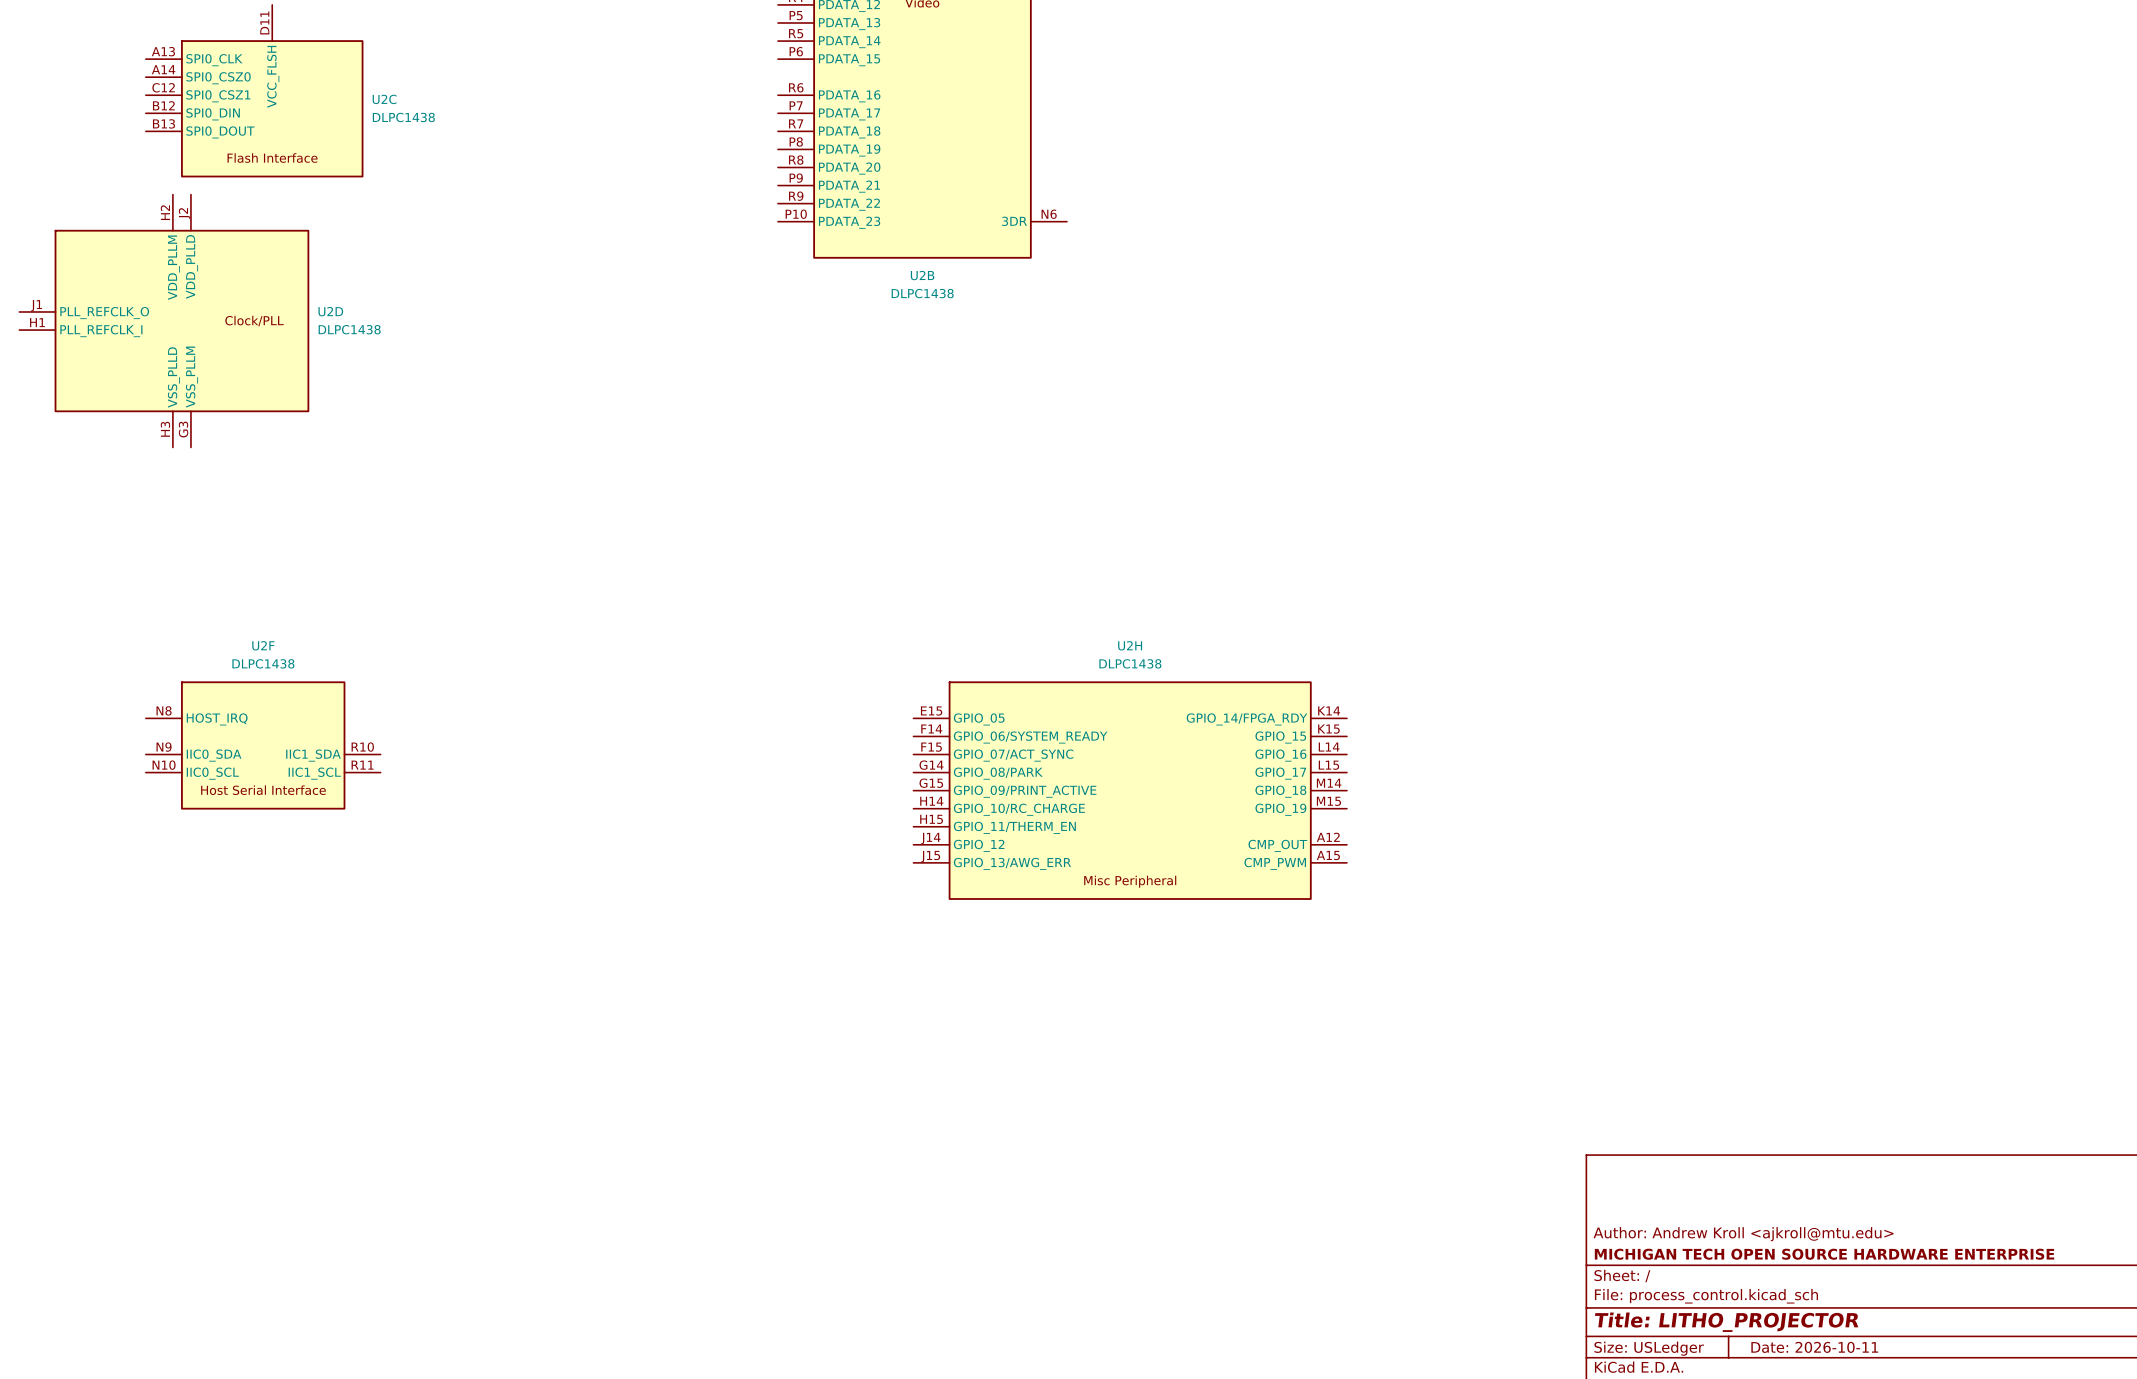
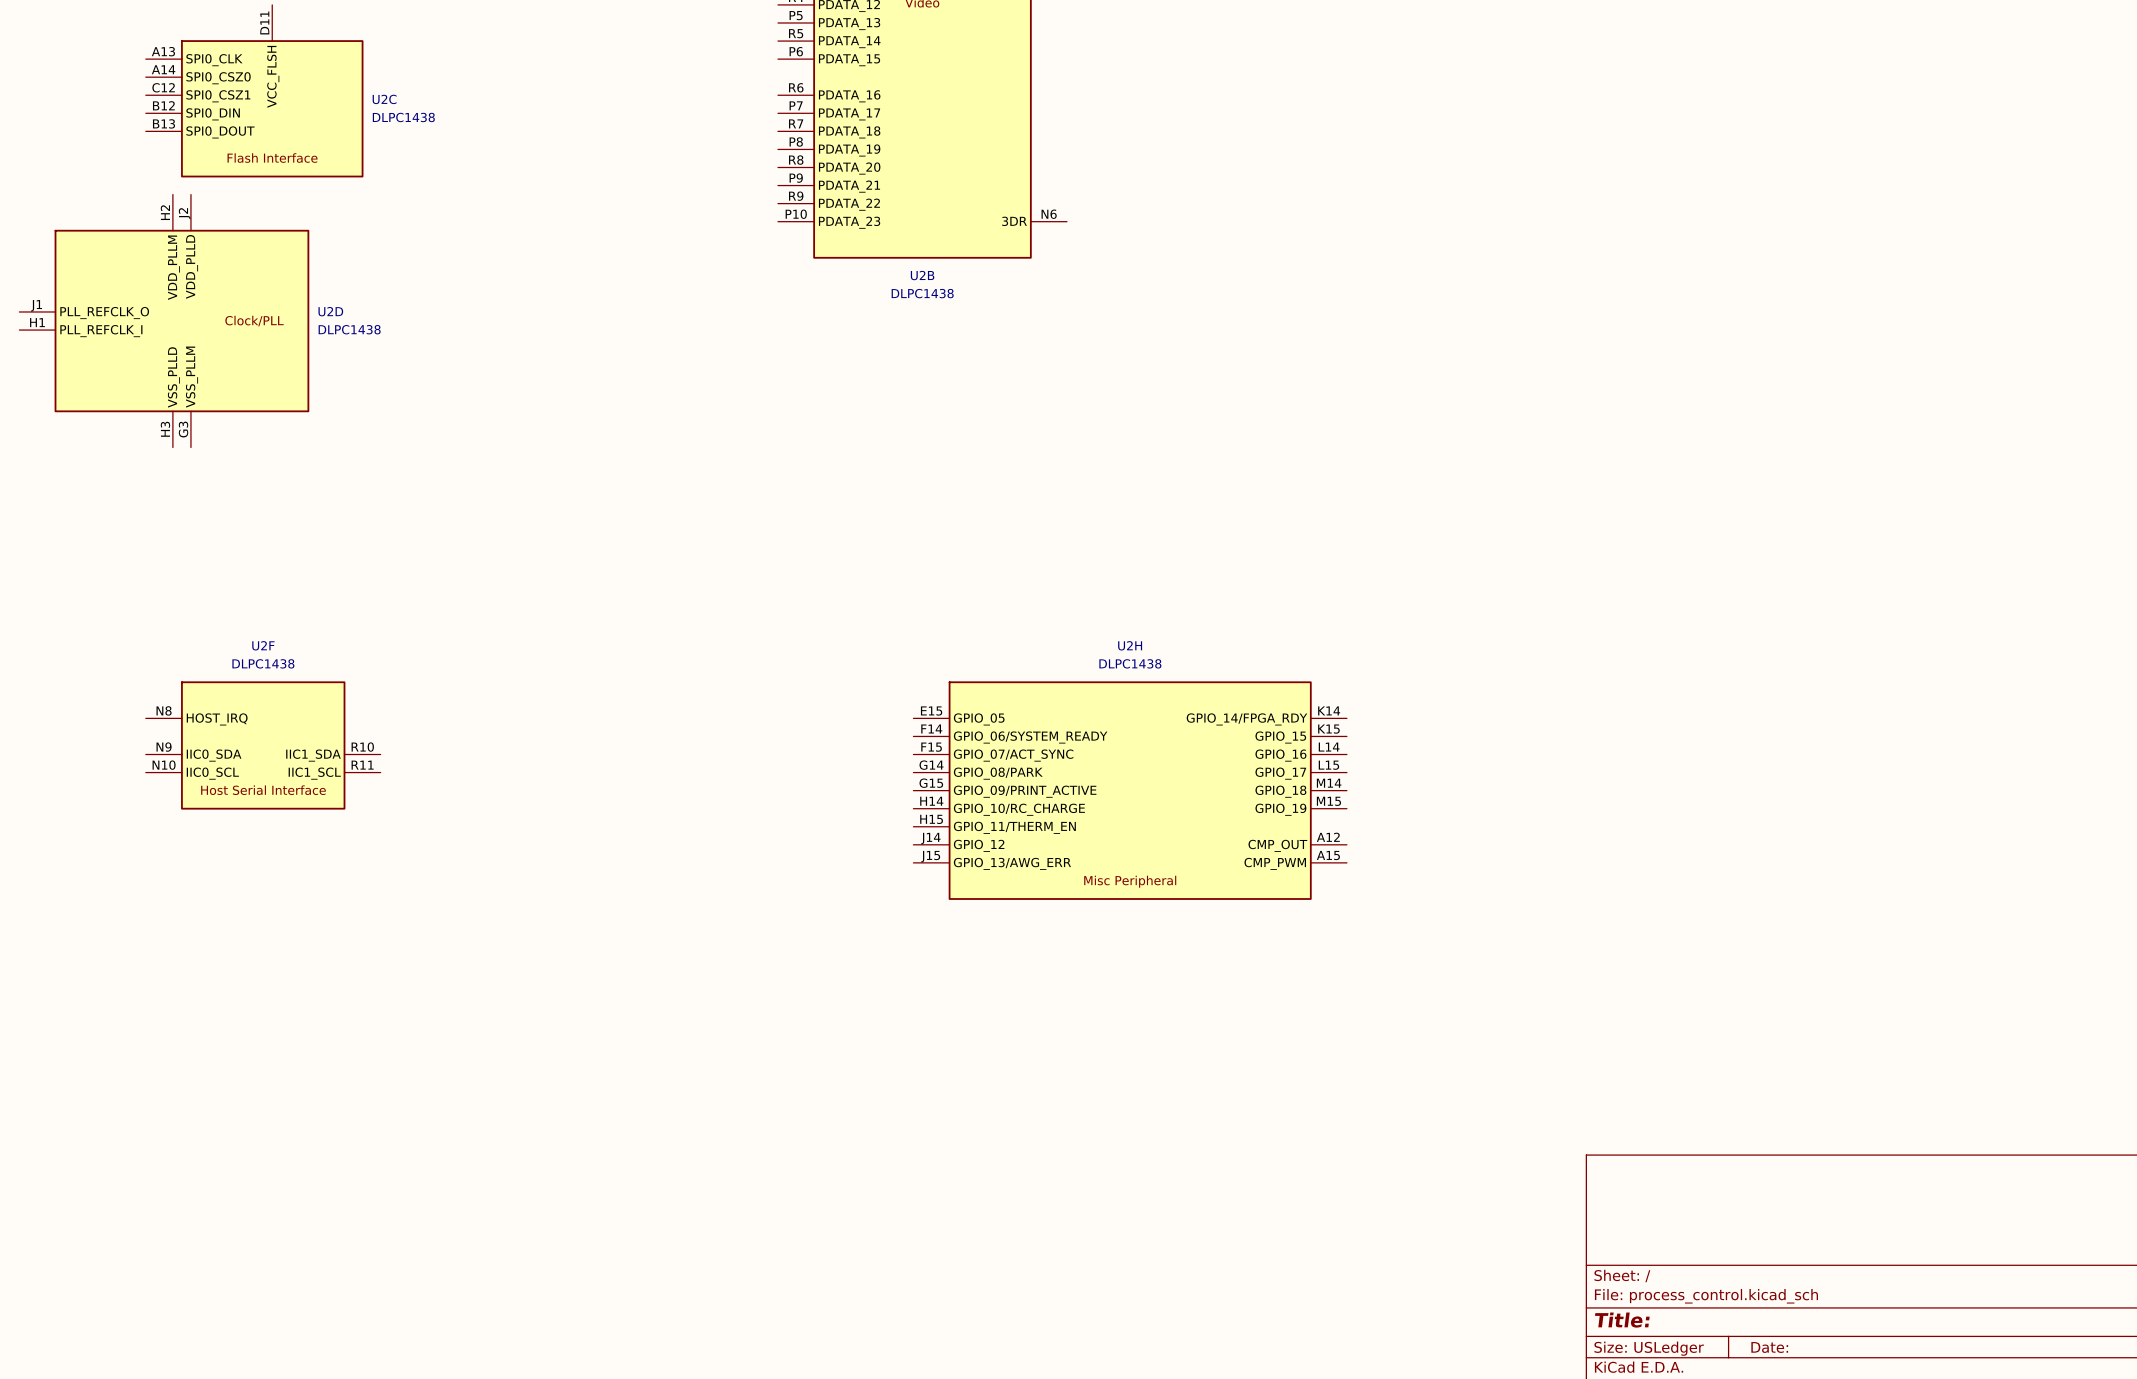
title block: Author: Andrew Kroll <ajkroll@mtu.edu> (1743, 1234) -> none
title block: MICHIGAN TECH OPEN SOURCE HARDWARE ENTERPRISE (1824, 1254) -> none
title block: Title: LITHO_PROJECTOR (1726, 1322) -> Title: (1622, 1320)
title block: Date: 2026-10-11 (1814, 1347) -> Date: (1769, 1347)

